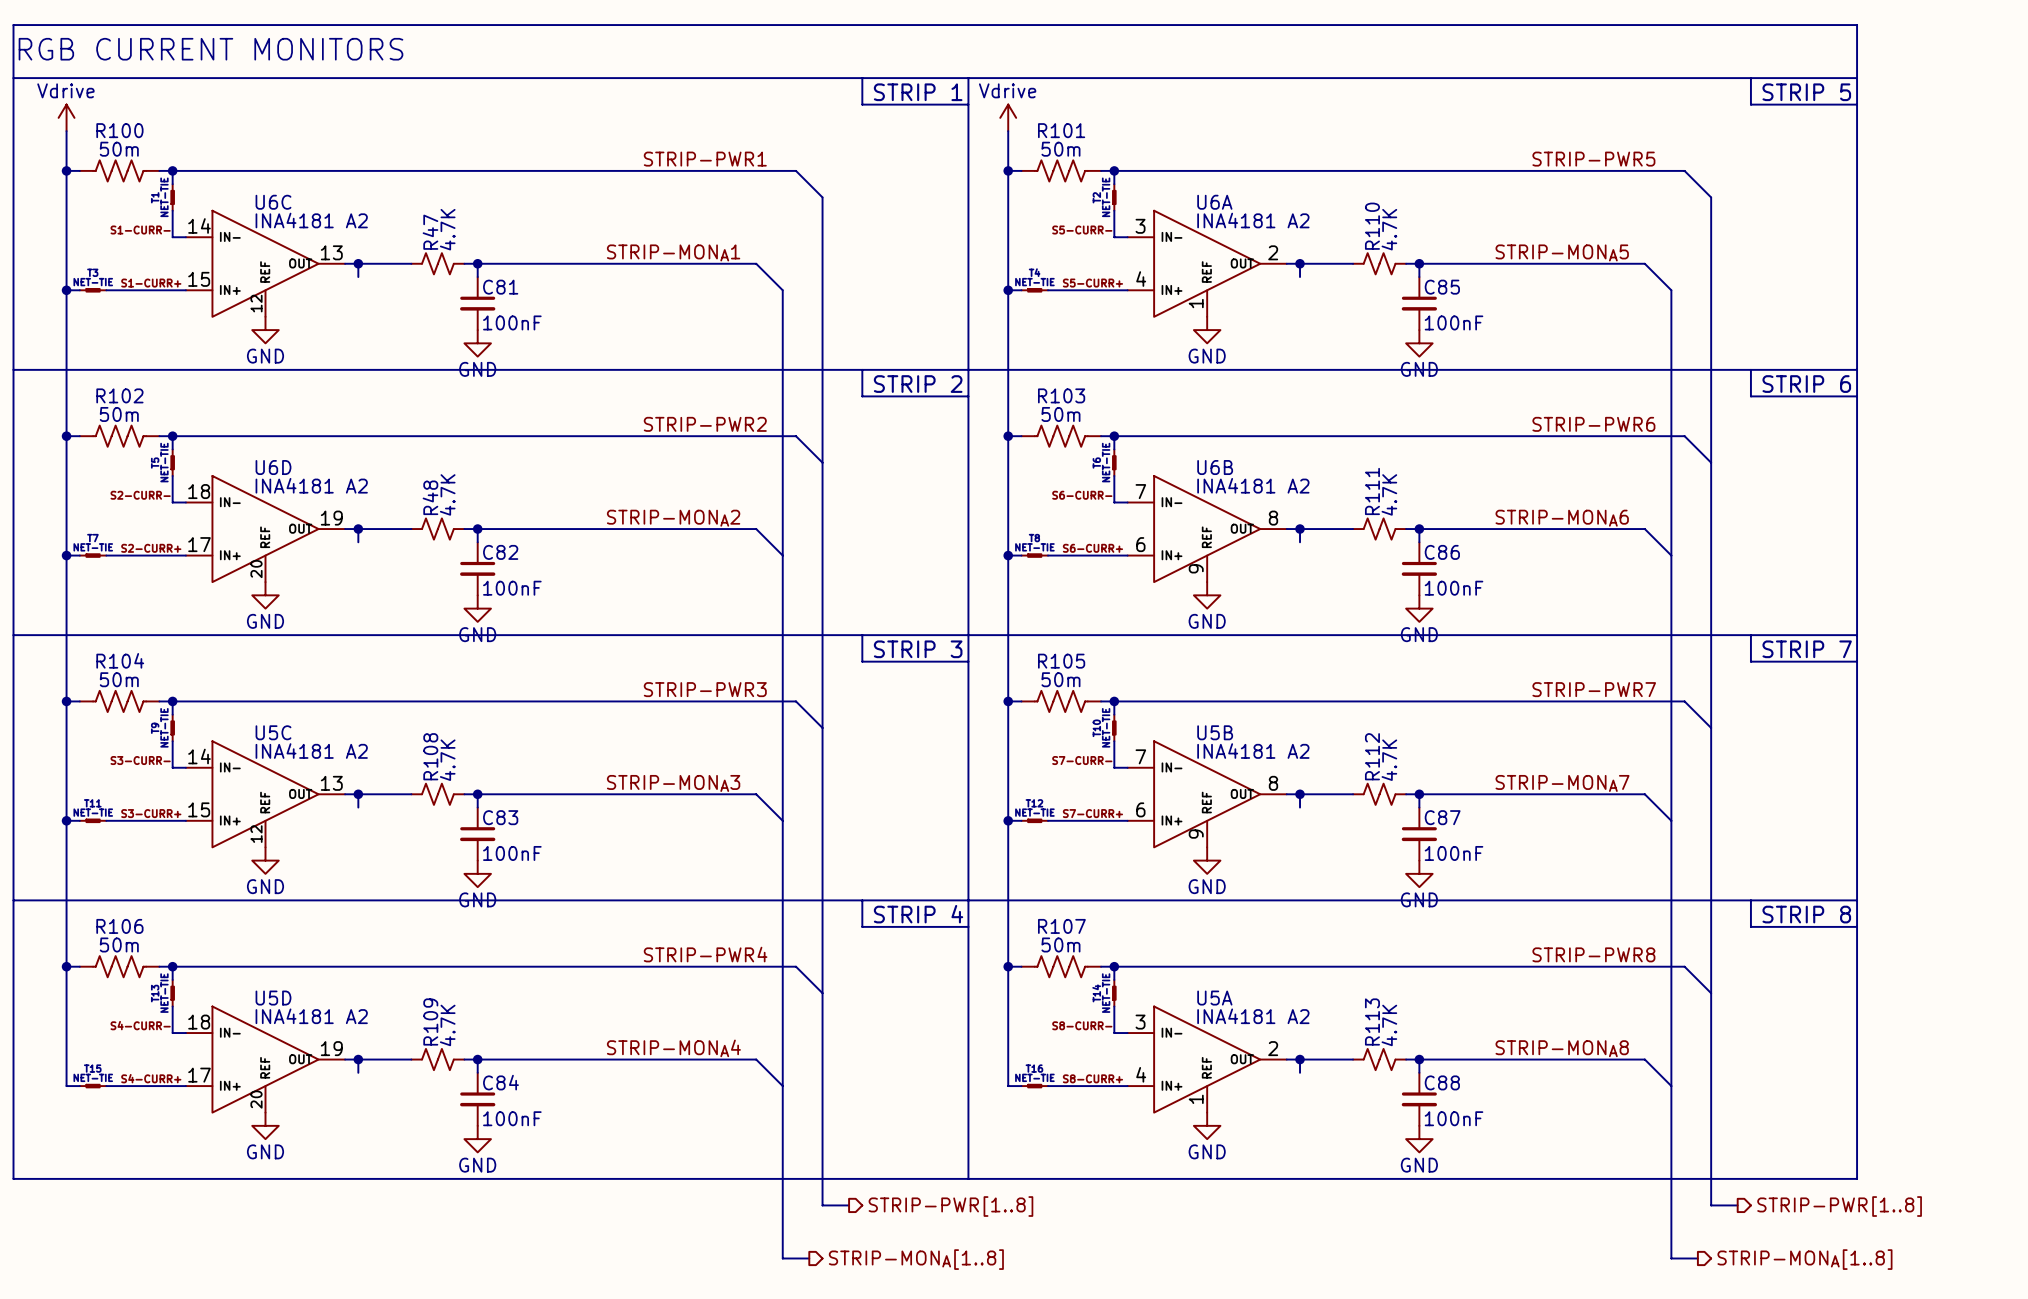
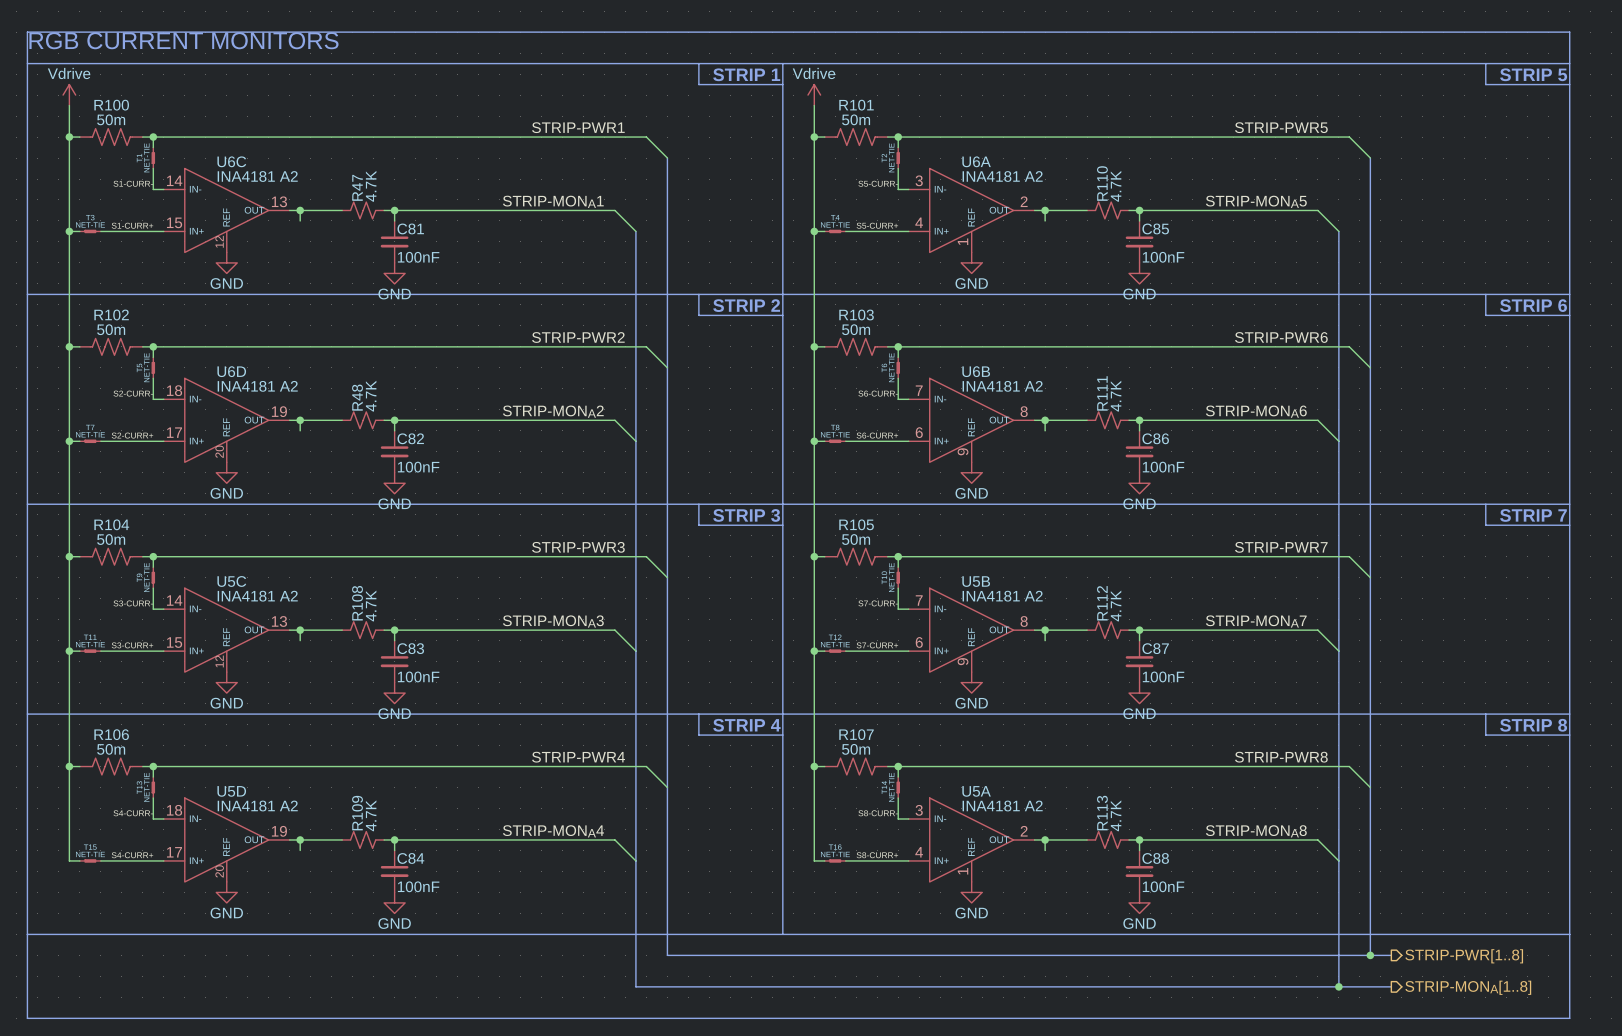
line: (13, 38) (13, 25) (1857, 25) (1857, 78) -> (1569, 63) (1485, 63)
line: none -> (27, 32) (1569, 32) (1569, 1018) (27, 1018) (27, 934)
line: (1750, 78) (1750, 104) (1857, 104) (1857, 369) -> (1569, 294) (1485, 294)
text position: STRIP 5 (1806, 92) -> STRIP 5 (1533, 74)
line: none -> (1485, 84) (1569, 84)
line: (1750, 369) (1750, 396) (1857, 396) (1857, 635) -> (1569, 504) (1485, 504)
text position: STRIP 6 (1806, 384) -> STRIP 6 (1533, 305)
line: none -> (1485, 315) (1569, 315)
line: (1750, 635) (1750, 661) (1857, 661) (1857, 900) -> (1569, 714) (1485, 714)
text position: STRIP 7 (1807, 649) -> STRIP 7 (1533, 515)
line: none -> (1485, 525) (1569, 525)
line: (1750, 900) (1750, 926) (1857, 926) (1857, 1178) -> (1569, 934) (1485, 934)
text position: STRIP 8 (1806, 914) -> STRIP 8 (1533, 725)
line: none -> (1485, 735) (1569, 735)
bus: none -> (688, 955) (1370, 955)
junction: none -> (1370, 955)
hierarchical label: STRIP-PWR[1..8] (950, 1206) -> none
bus: (782, 1245) (782, 1258) (809, 1258) -> (635, 986) (1391, 986)
bus: (1671, 1245) (1671, 1258) (1697, 1258) -> none
junction: none -> (1338, 986)
hierarchical label: STRIP-MONA[1..8] (916, 1259) -> none
hierarchical label position: STRIP-MONA[1..8] (1804, 1259) -> STRIP-MONA[1..8] (1468, 987)

